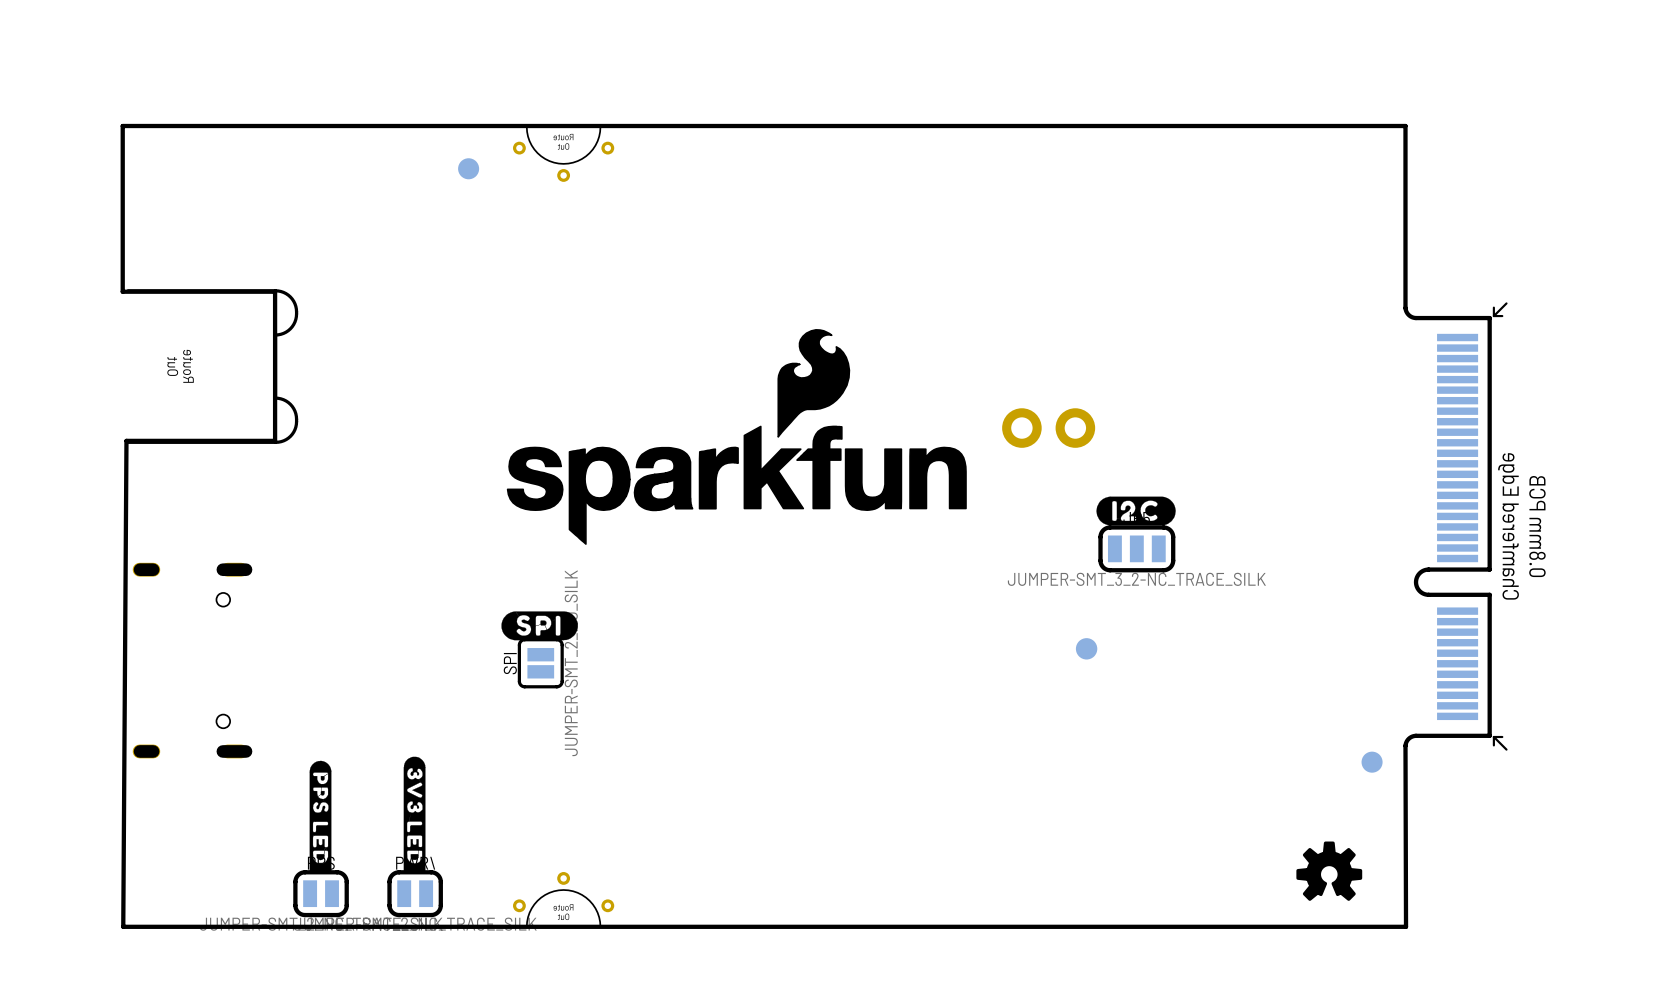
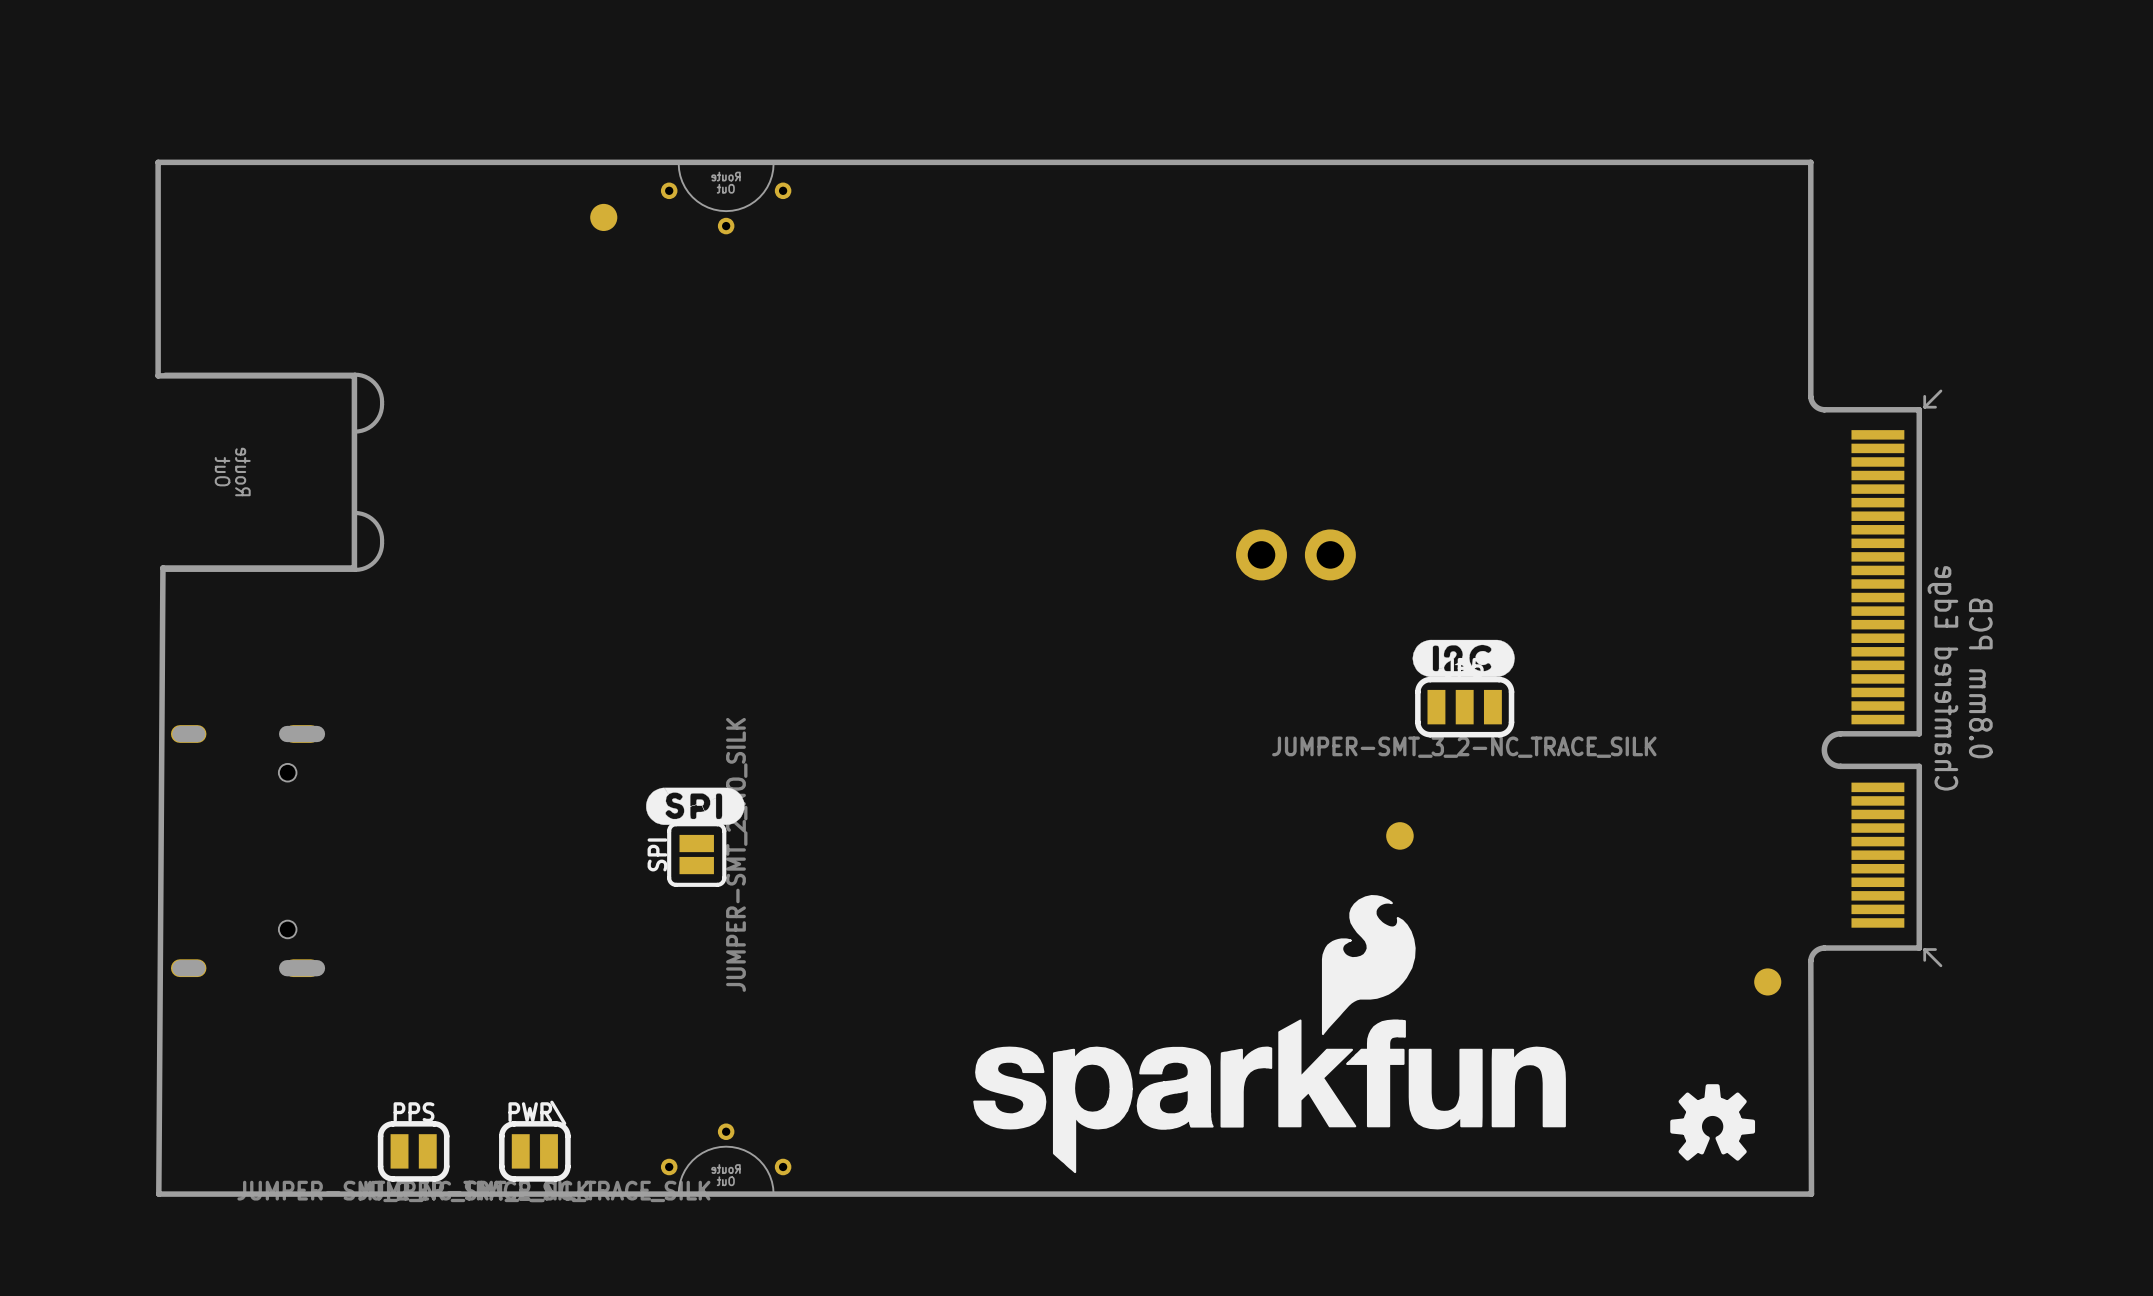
part position: (1048, 428) -> (1295, 554)
drawing position: (736, 436) -> (1269, 1034)
drawing: [403, 756, 426, 872] -> none
drawing: [309, 760, 332, 872] -> none

